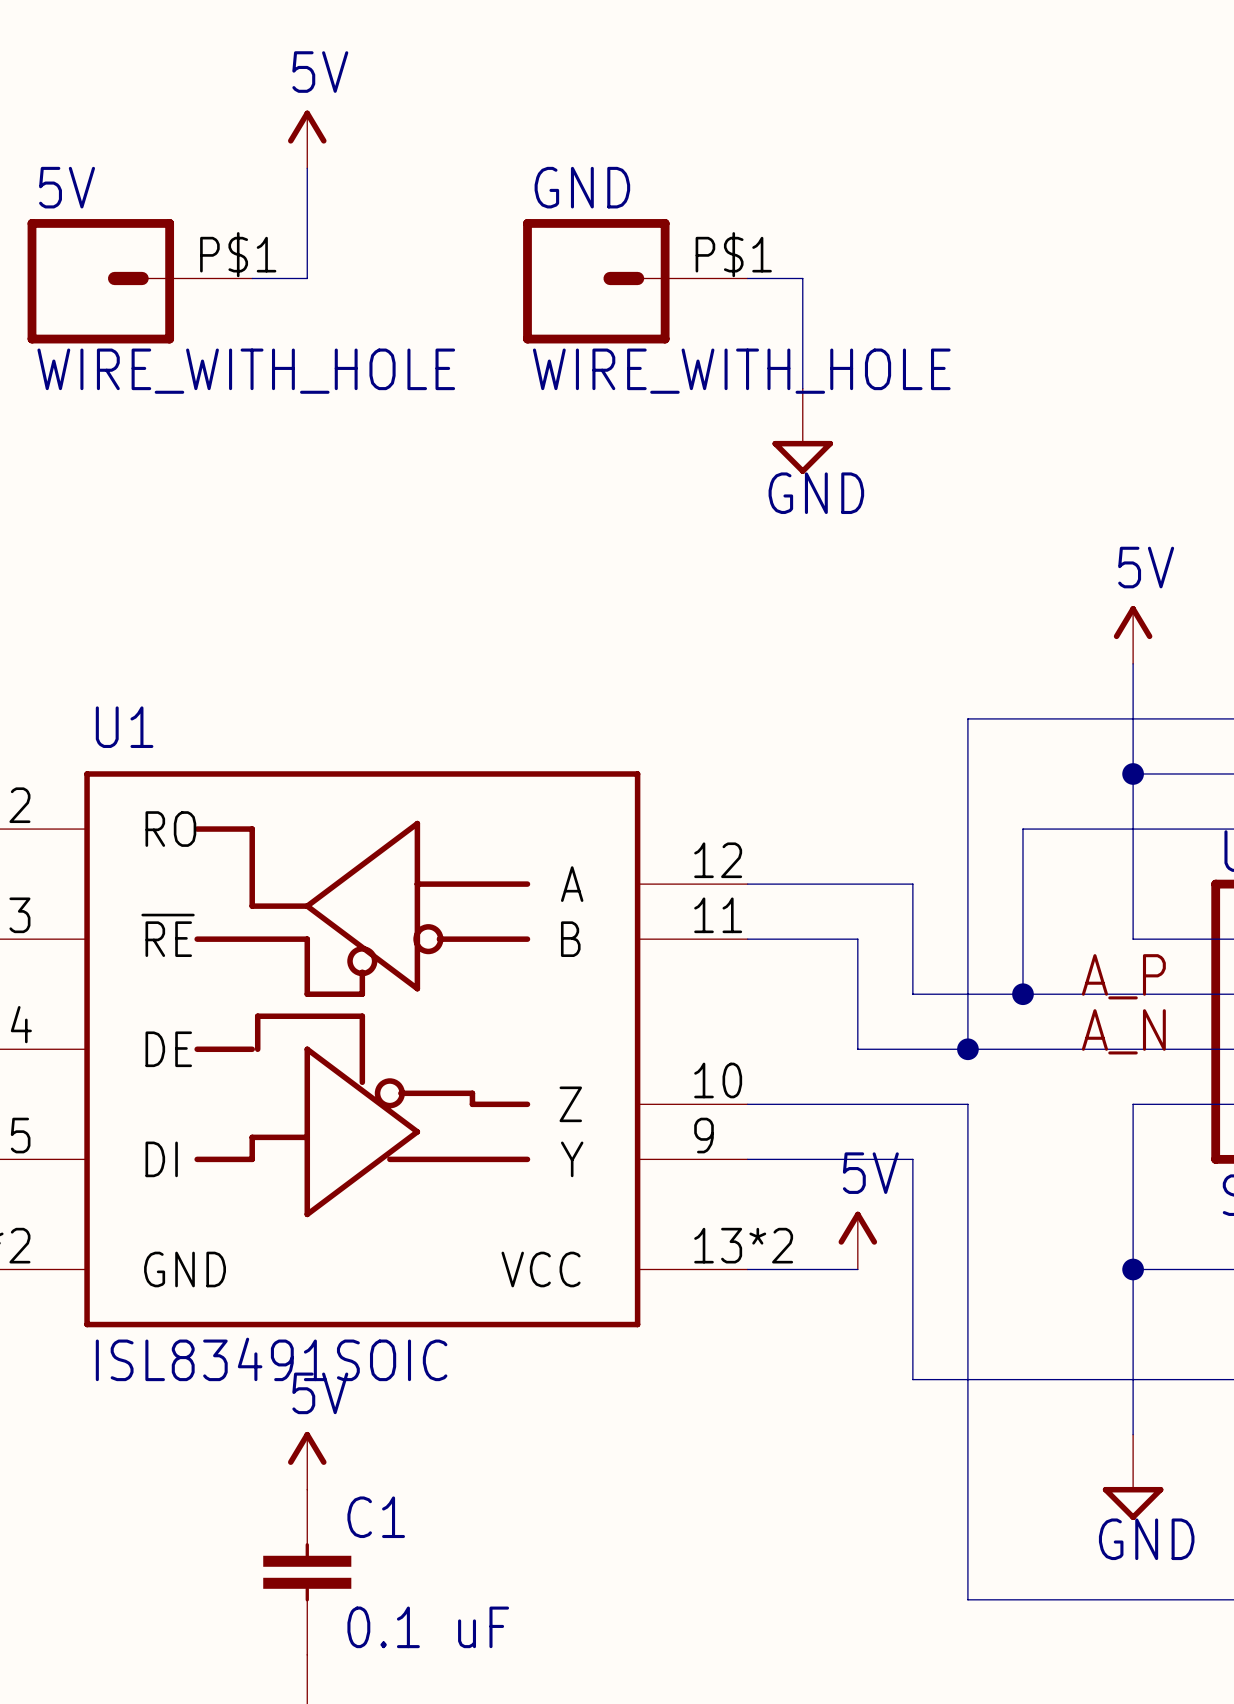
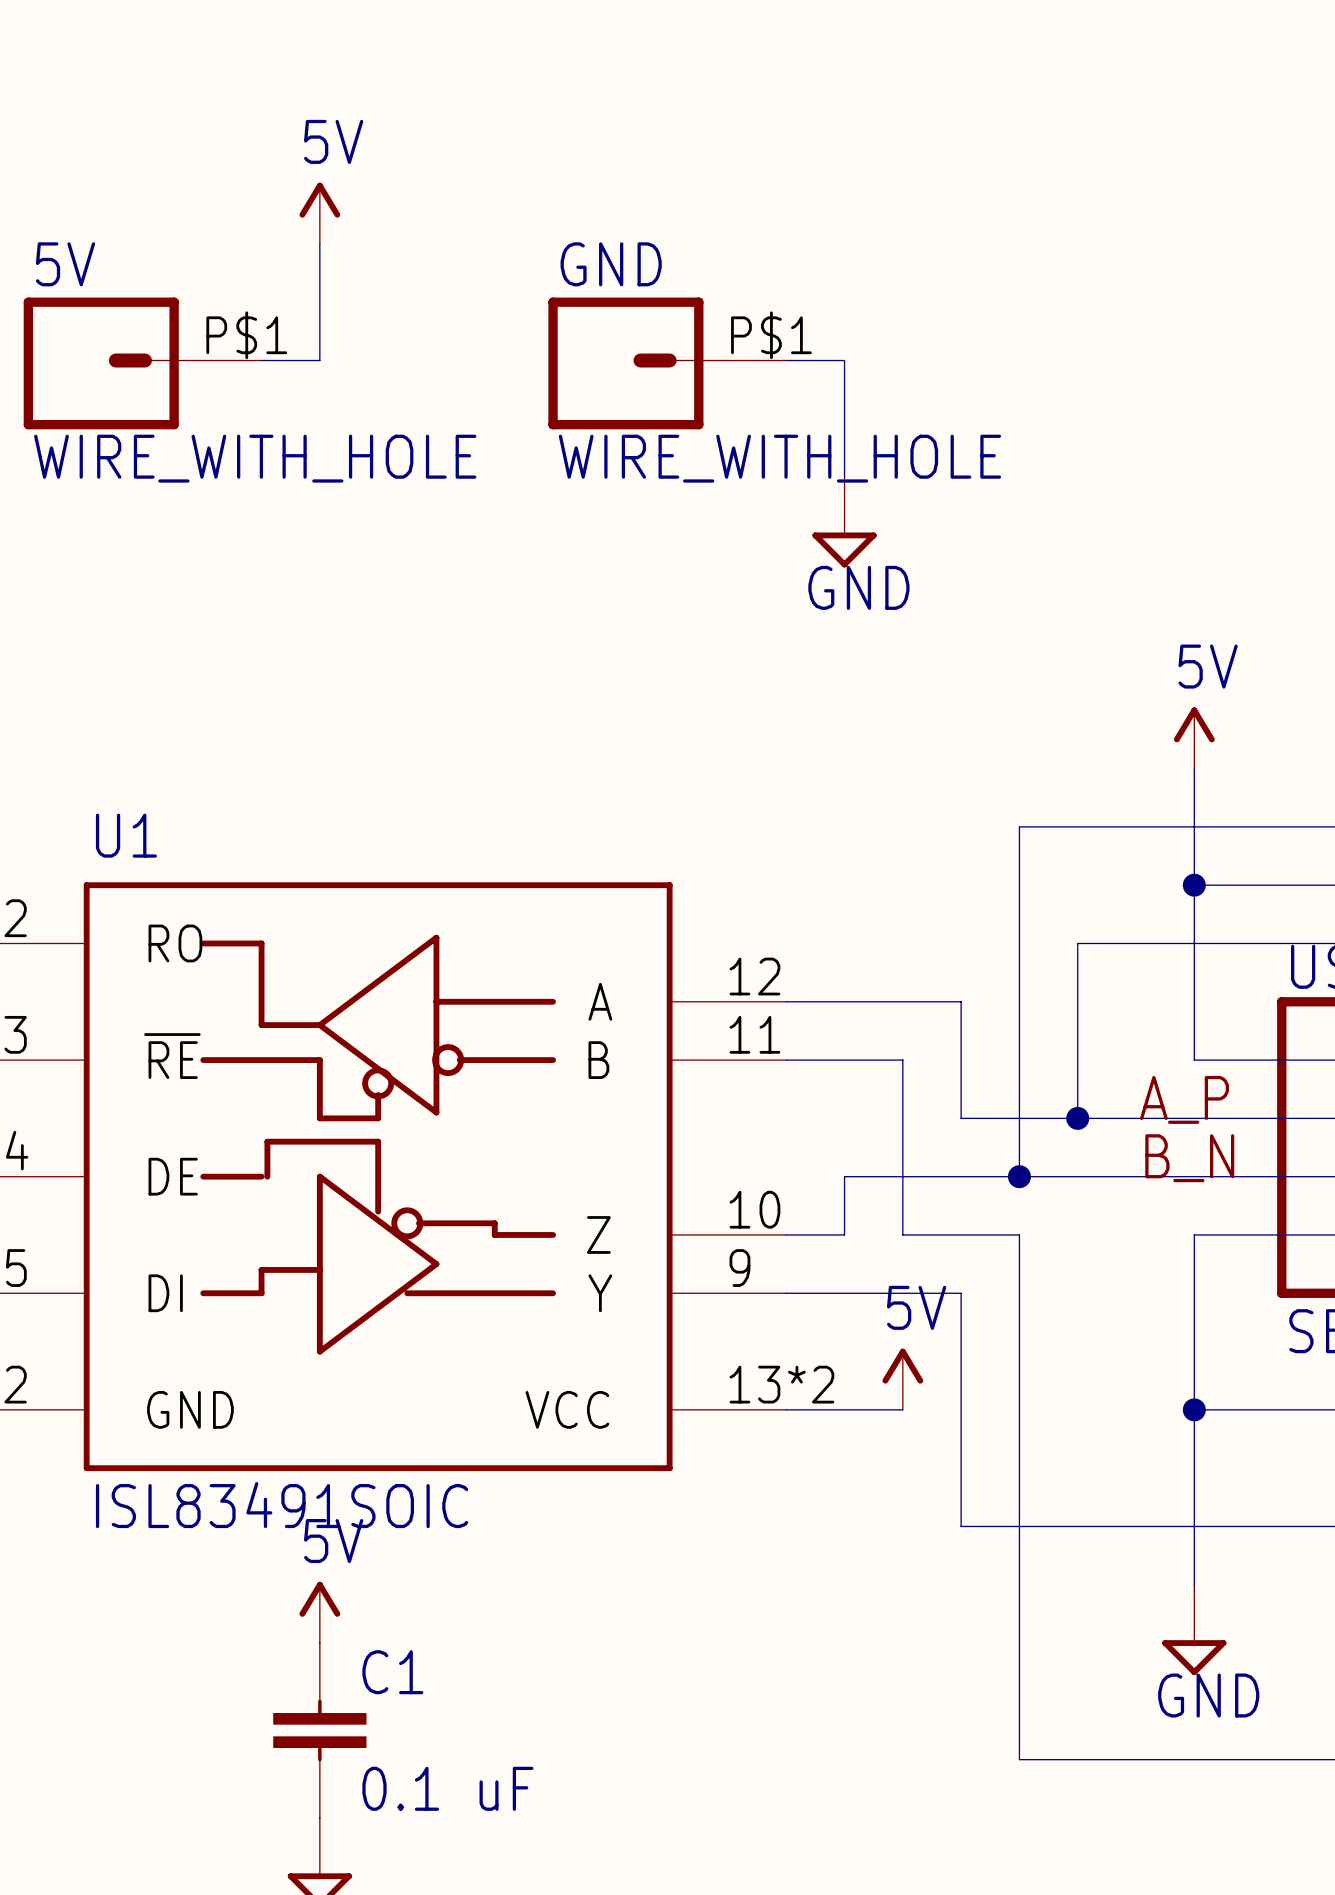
label: A_N (1123, 1031) -> B_N (1189, 1158)
wire: (802, 1104) (857, 1104) -> (844, 1234) (844, 1176) (902, 1176) (902, 1234)

